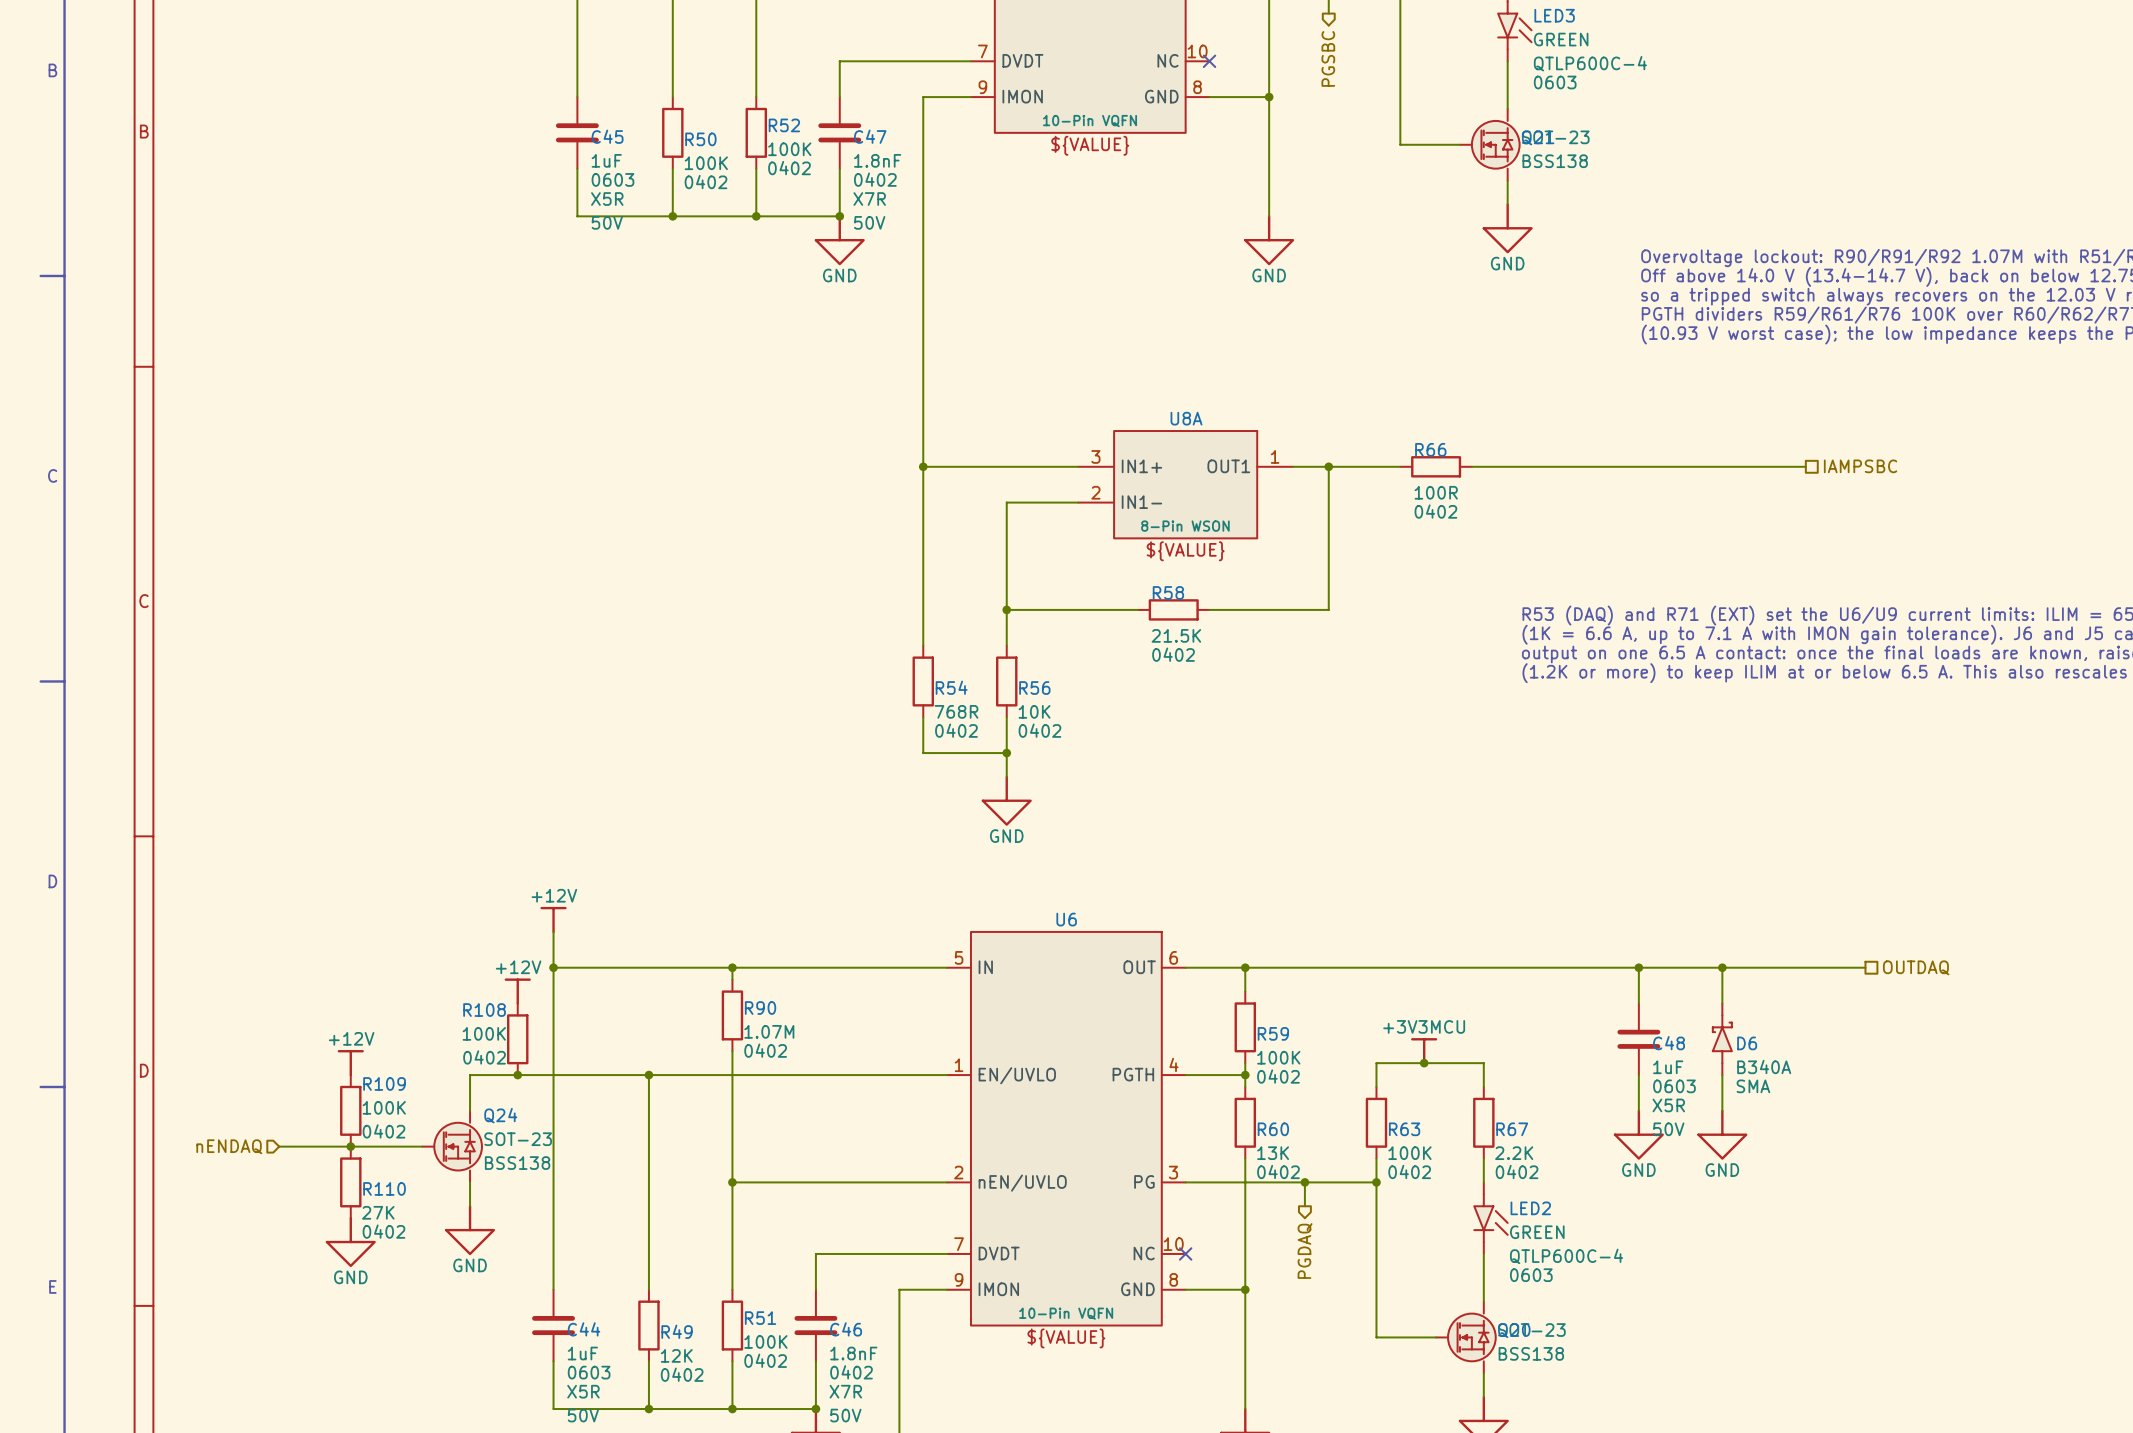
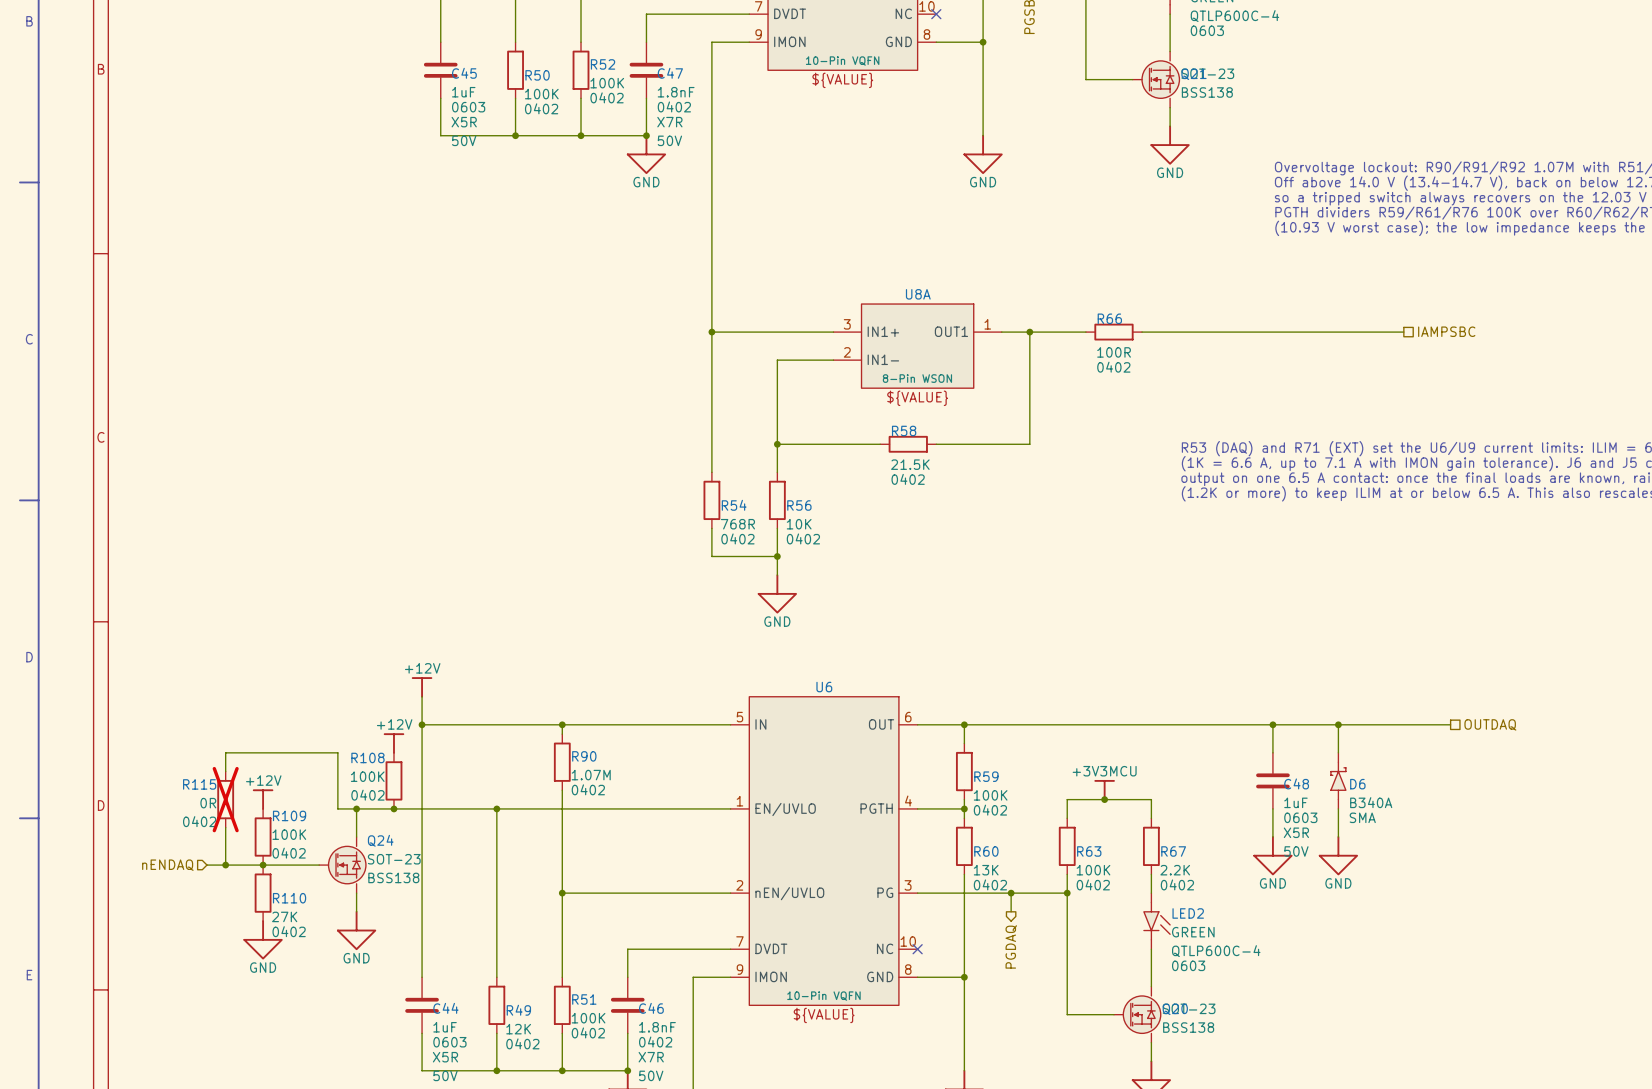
wire: none -> (225, 771) (225, 752) (337, 752) (337, 808) (356, 808)
R115: none -> 0R (225, 799)
junction: none -> (356, 808)
wire: none -> (225, 827) (225, 865)
junction: none -> (225, 865)

